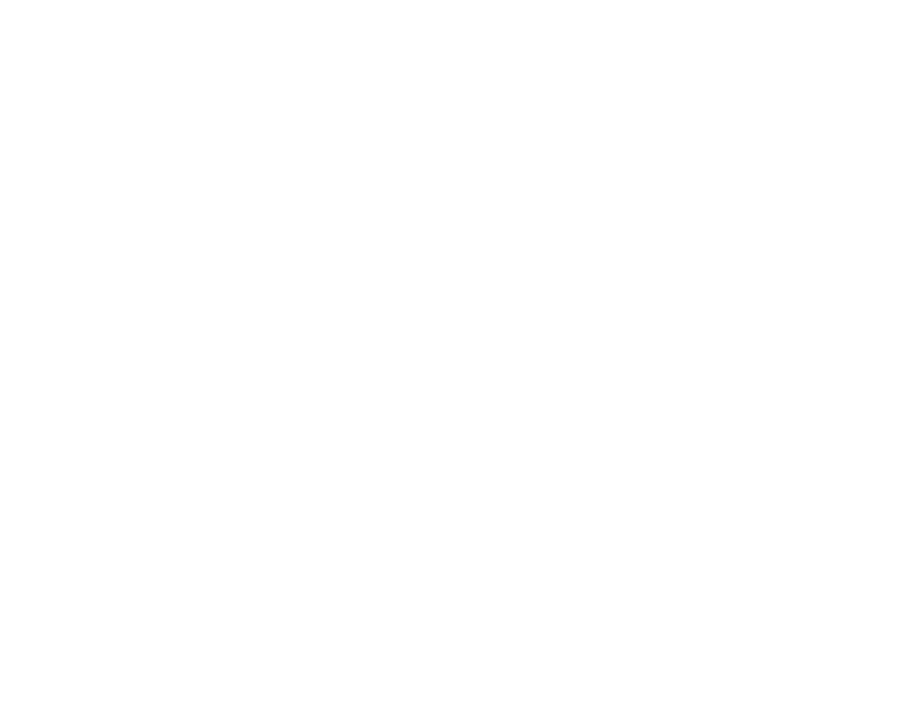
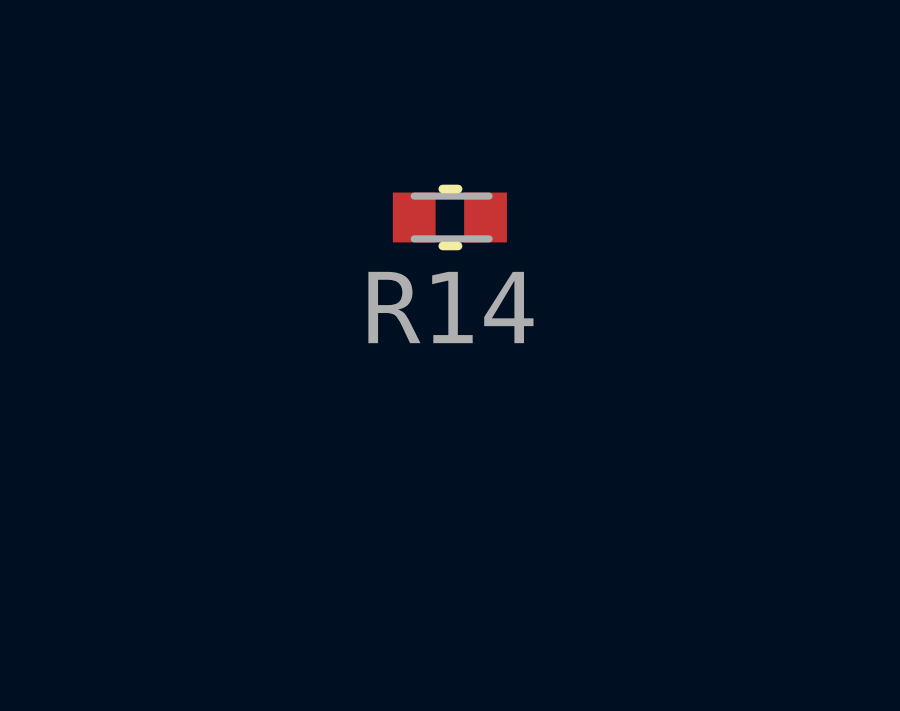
R14: none -> (449, 217)

